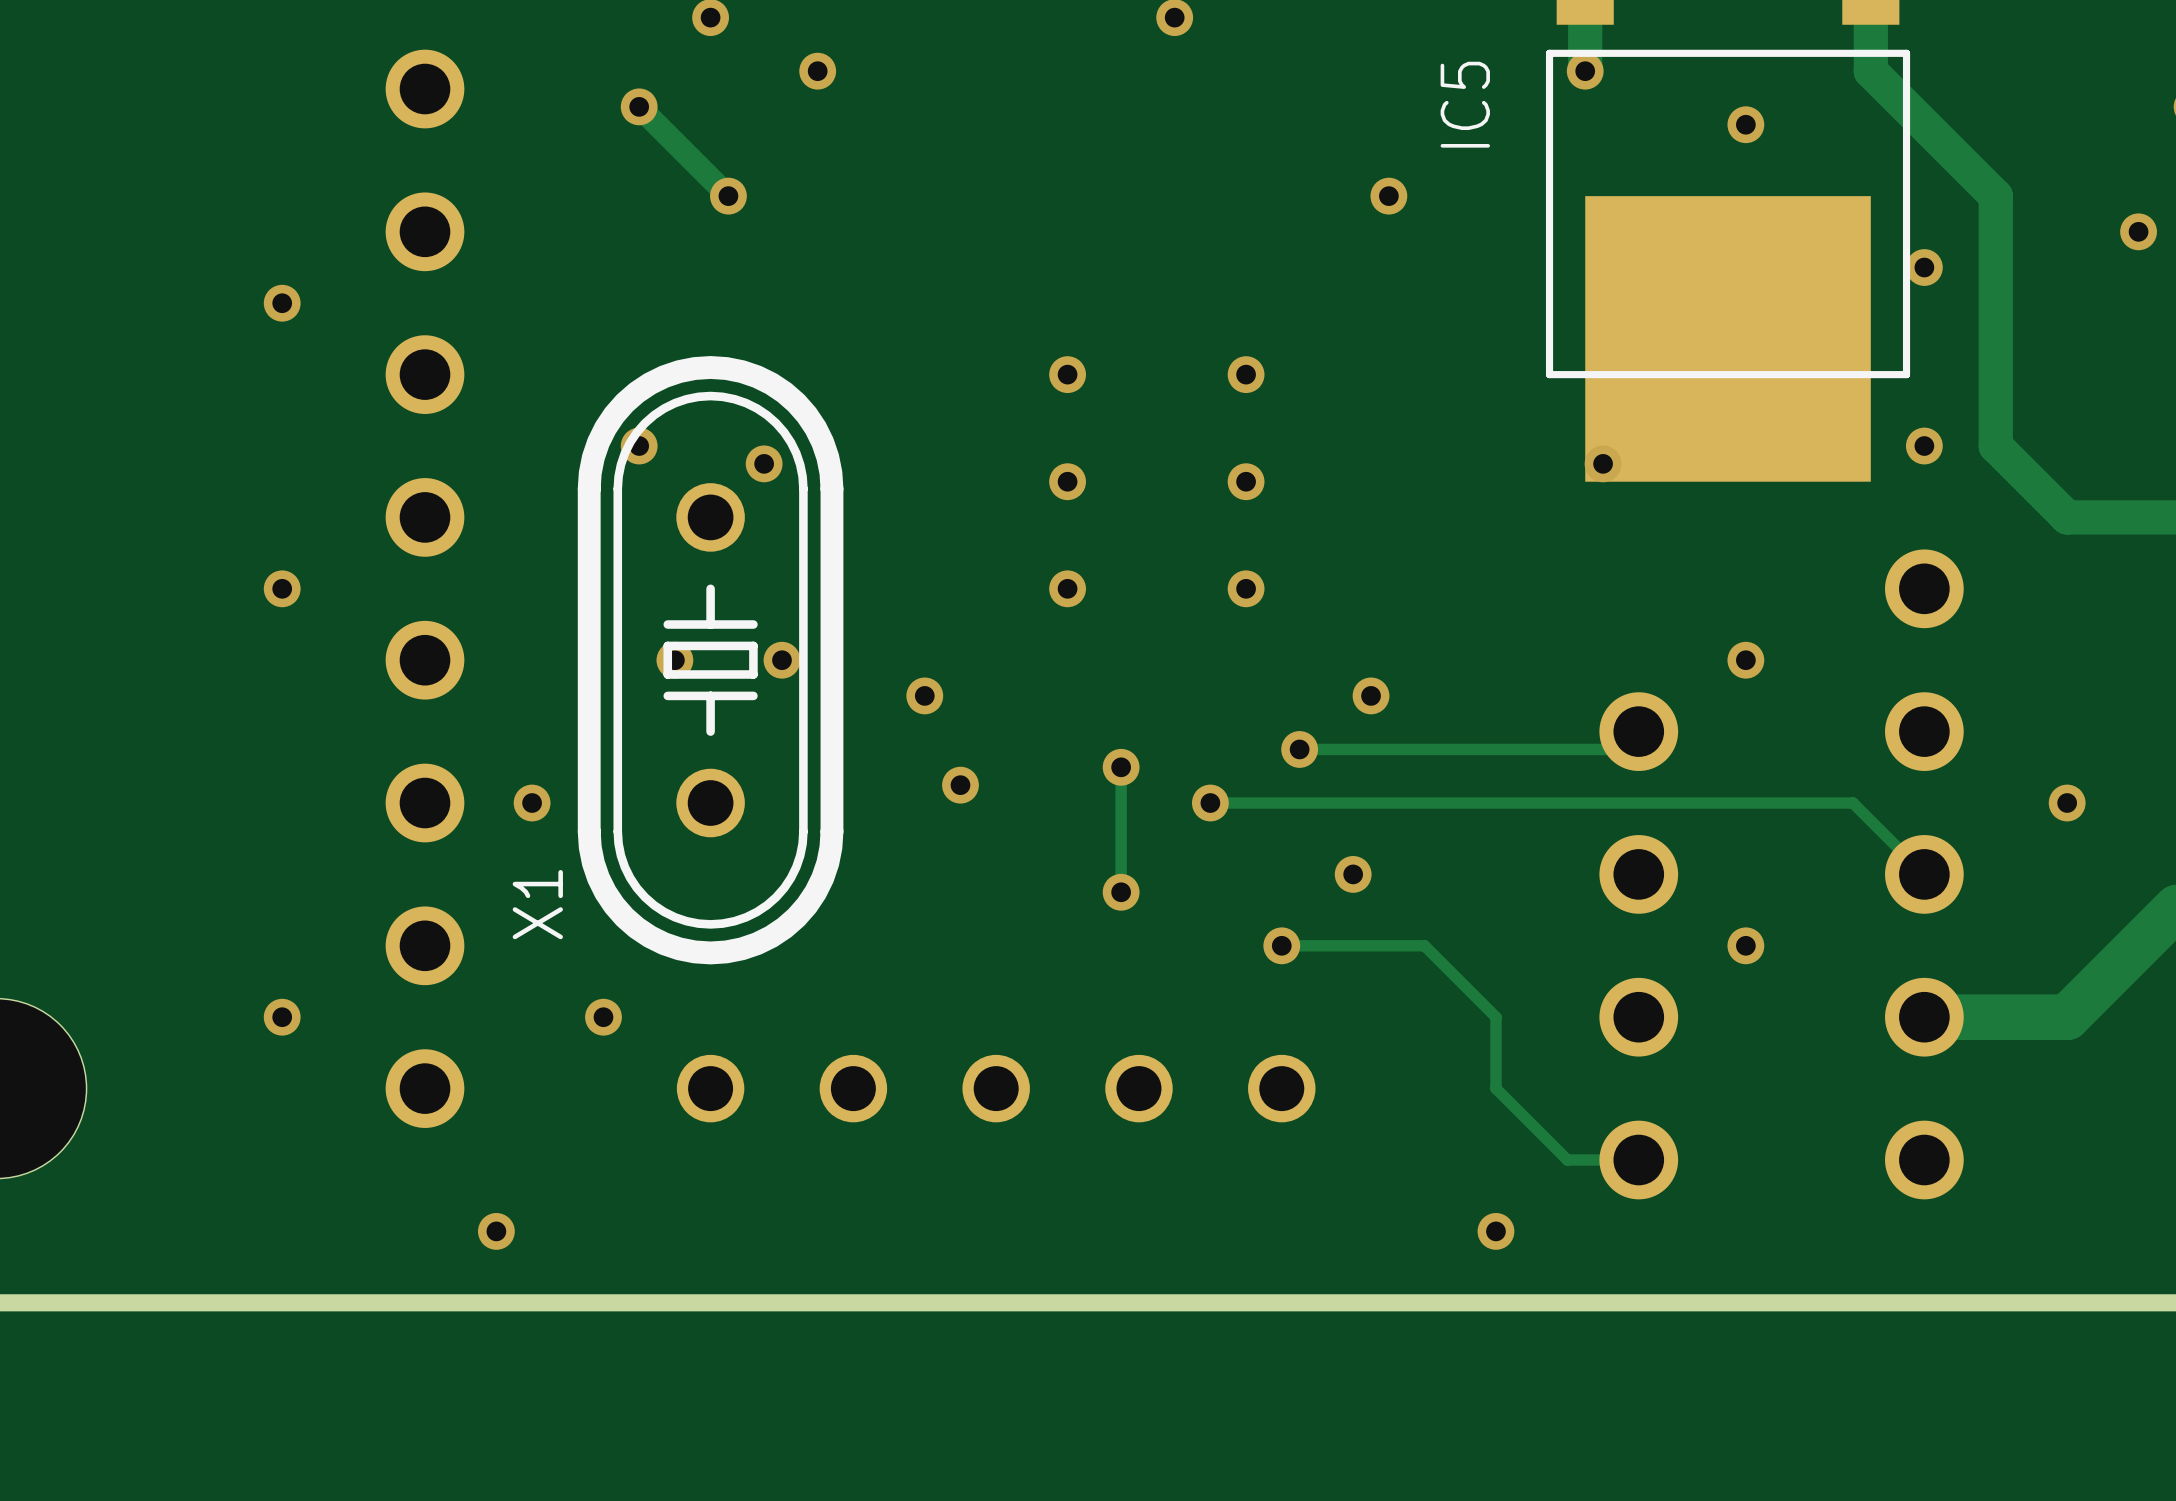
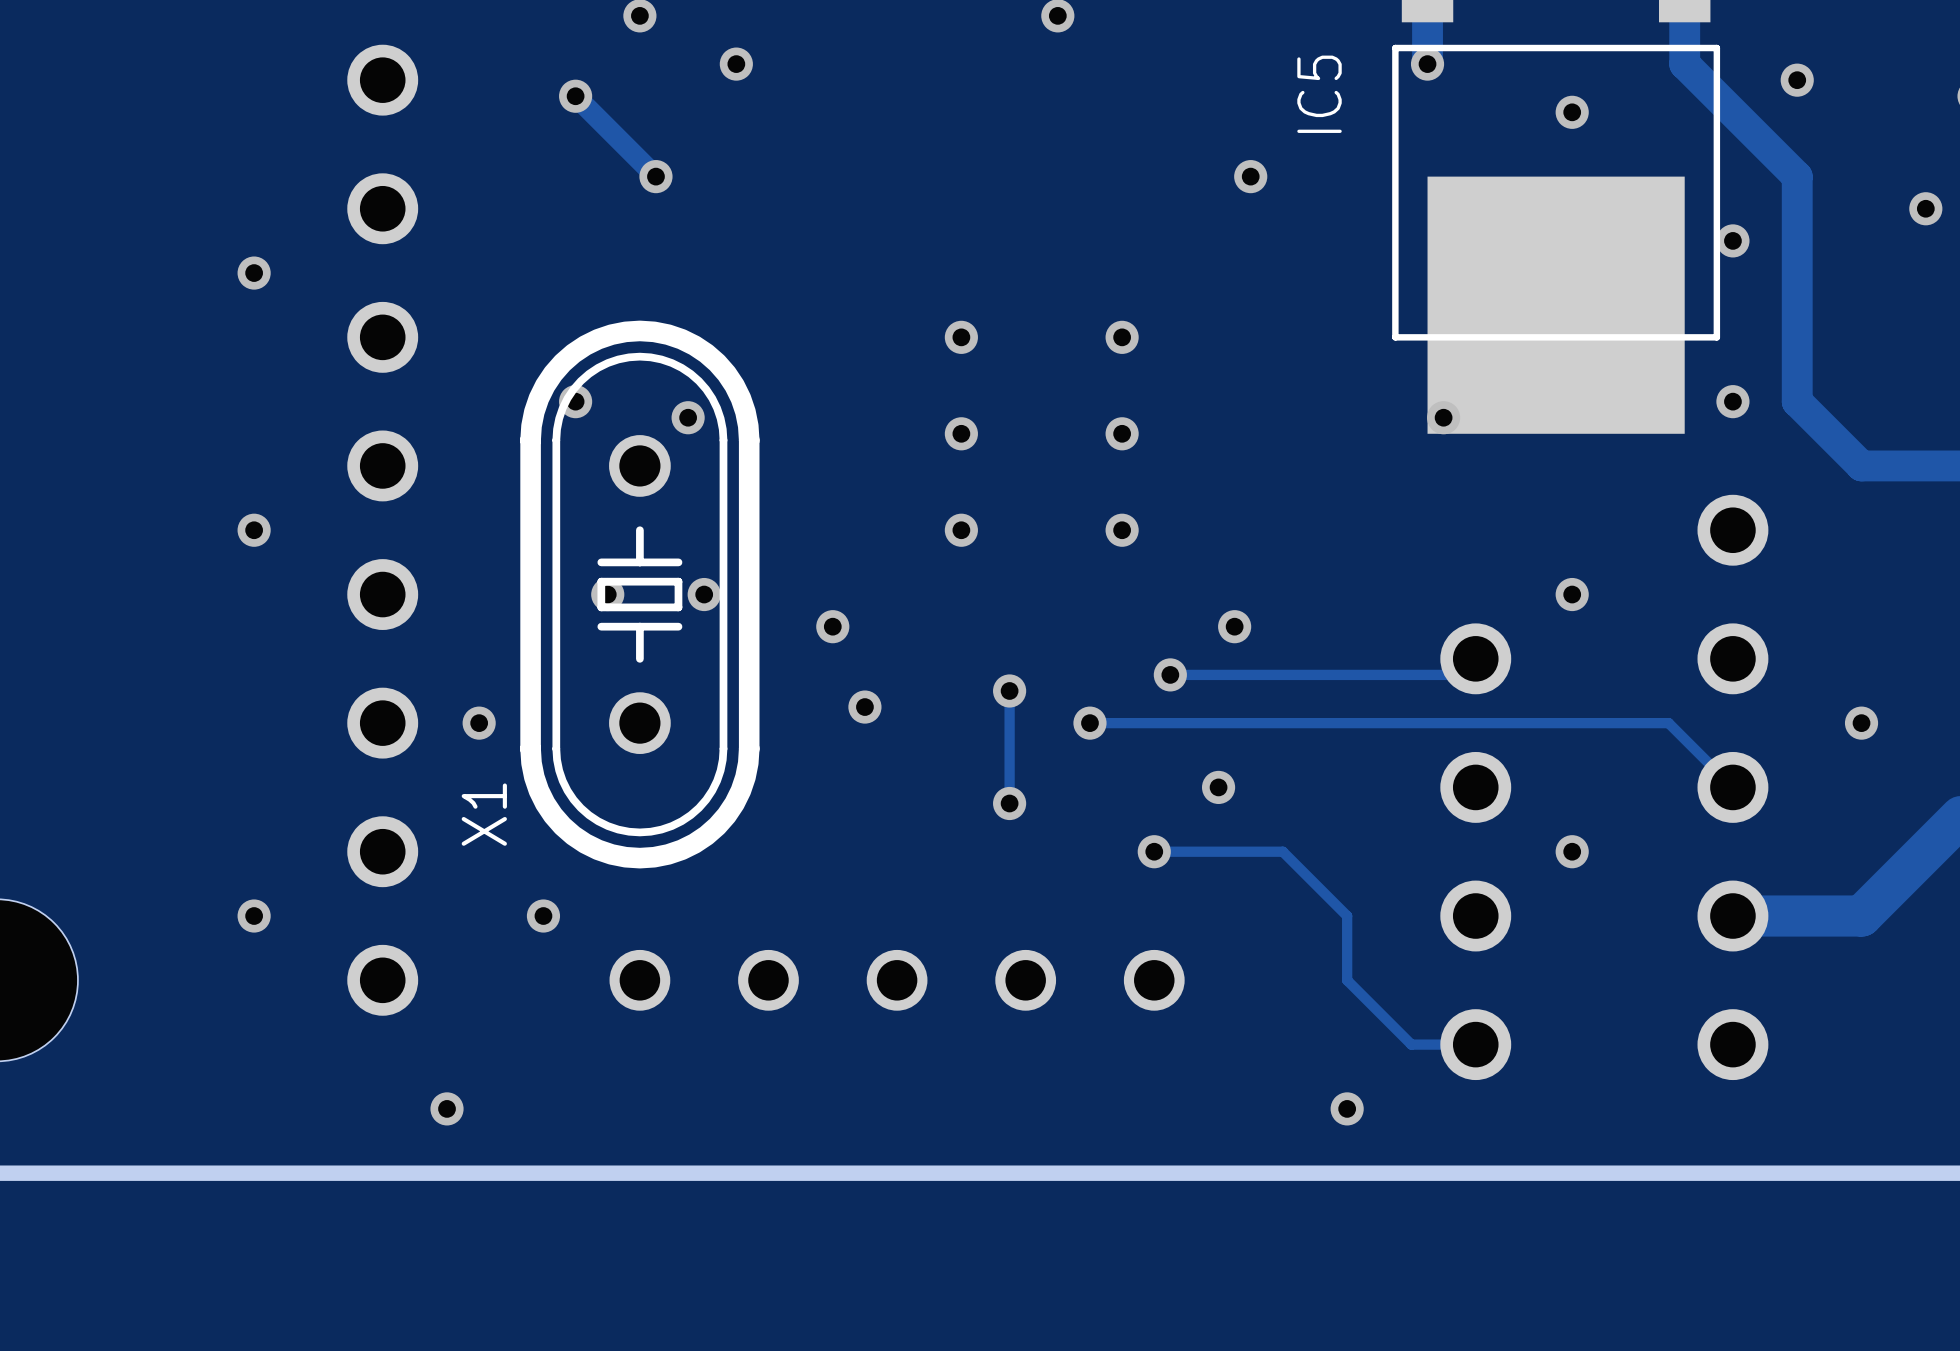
via: none -> (1797, 80)

